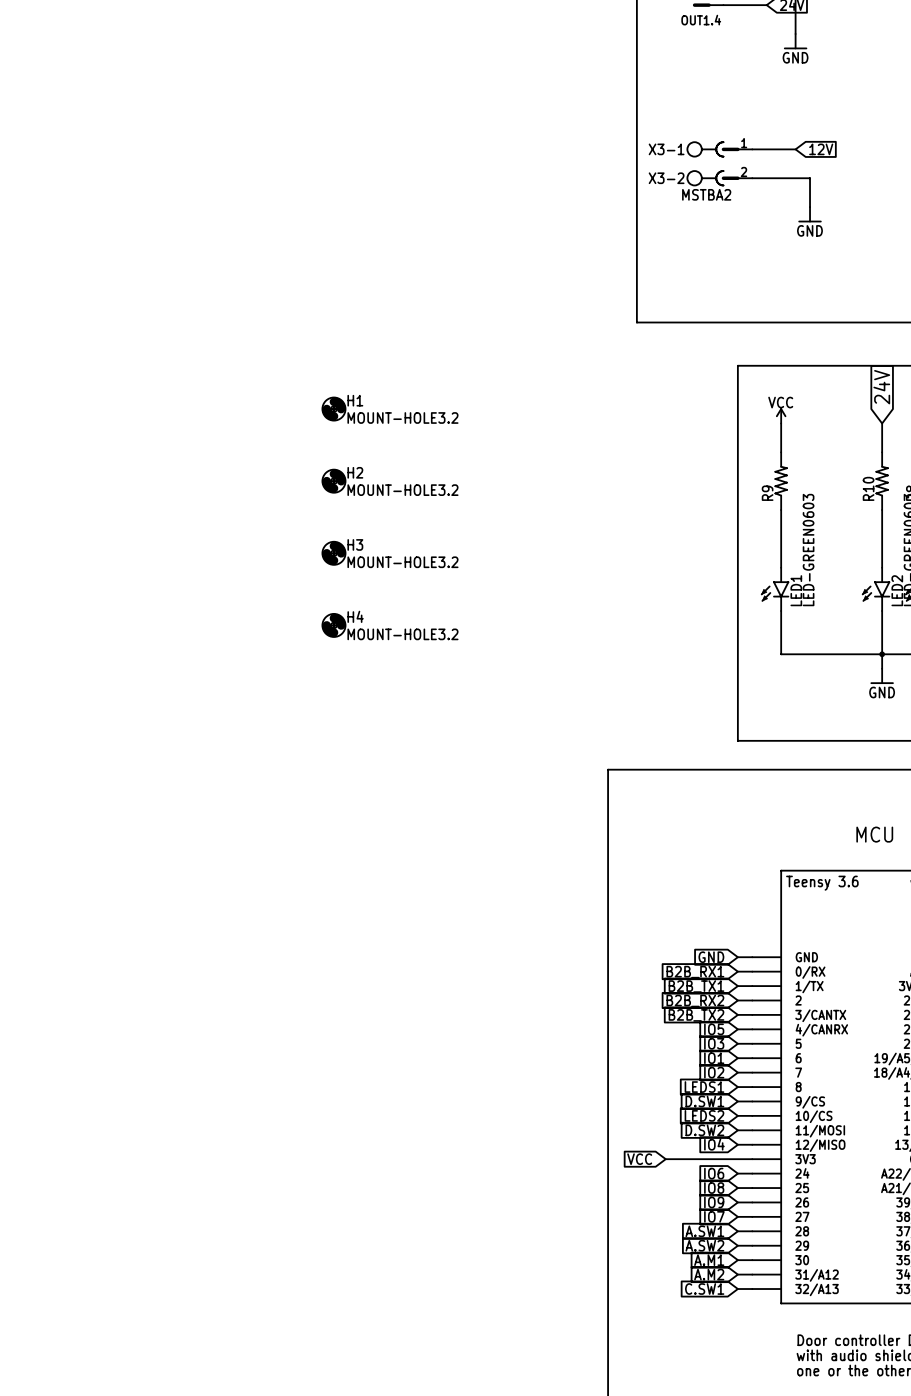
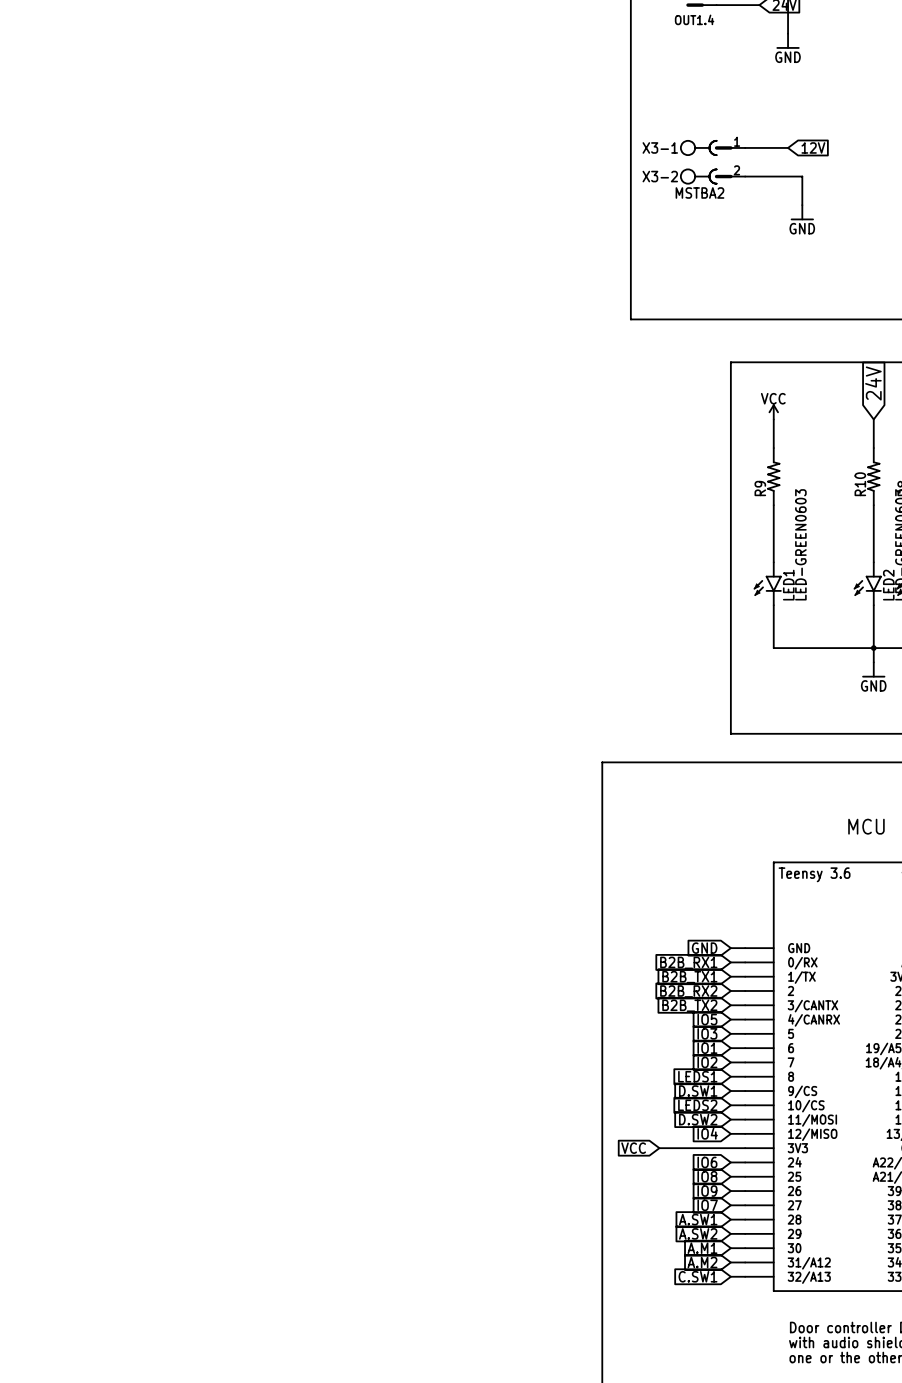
H1: MOUNT-HOLE3.2 (333, 409) -> none
H2: MOUNT-HOLE3.2 (333, 481) -> none
H3: MOUNT-HOLE3.2 (333, 553) -> none
H4: MOUNT-HOLE3.2 (333, 625) -> none

